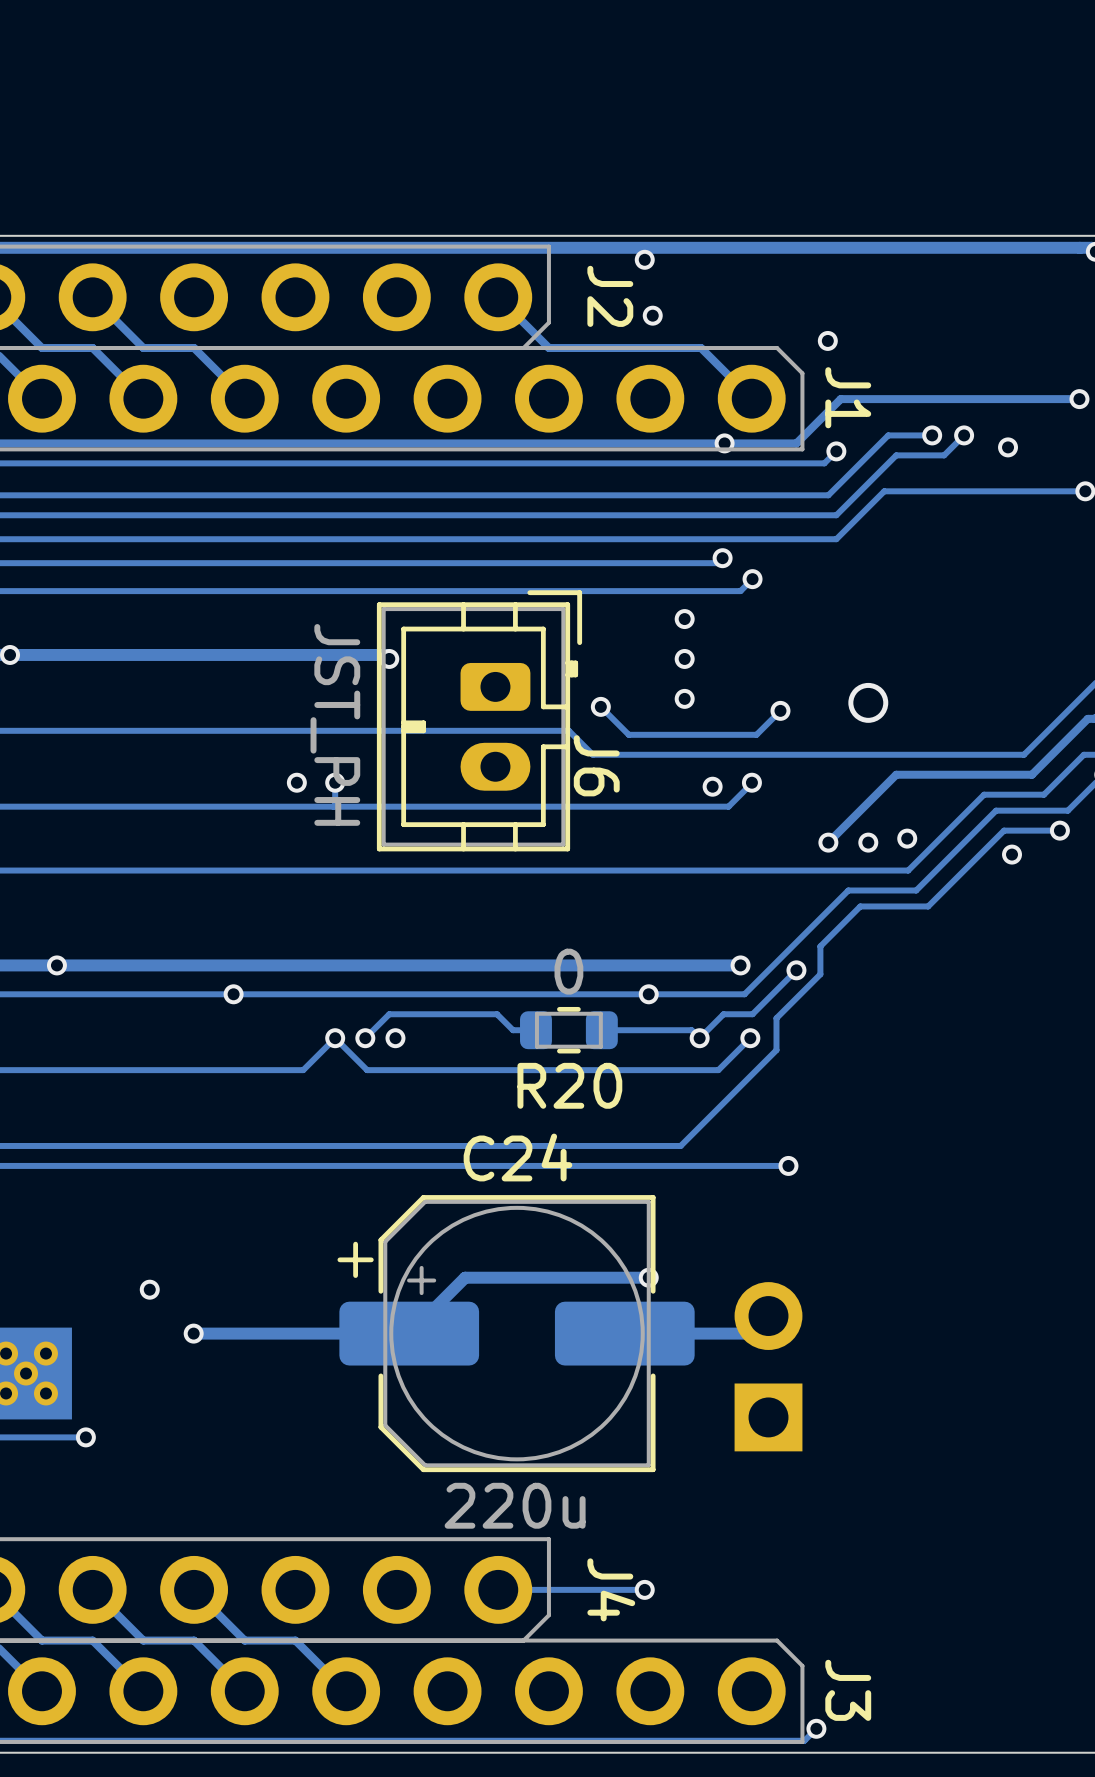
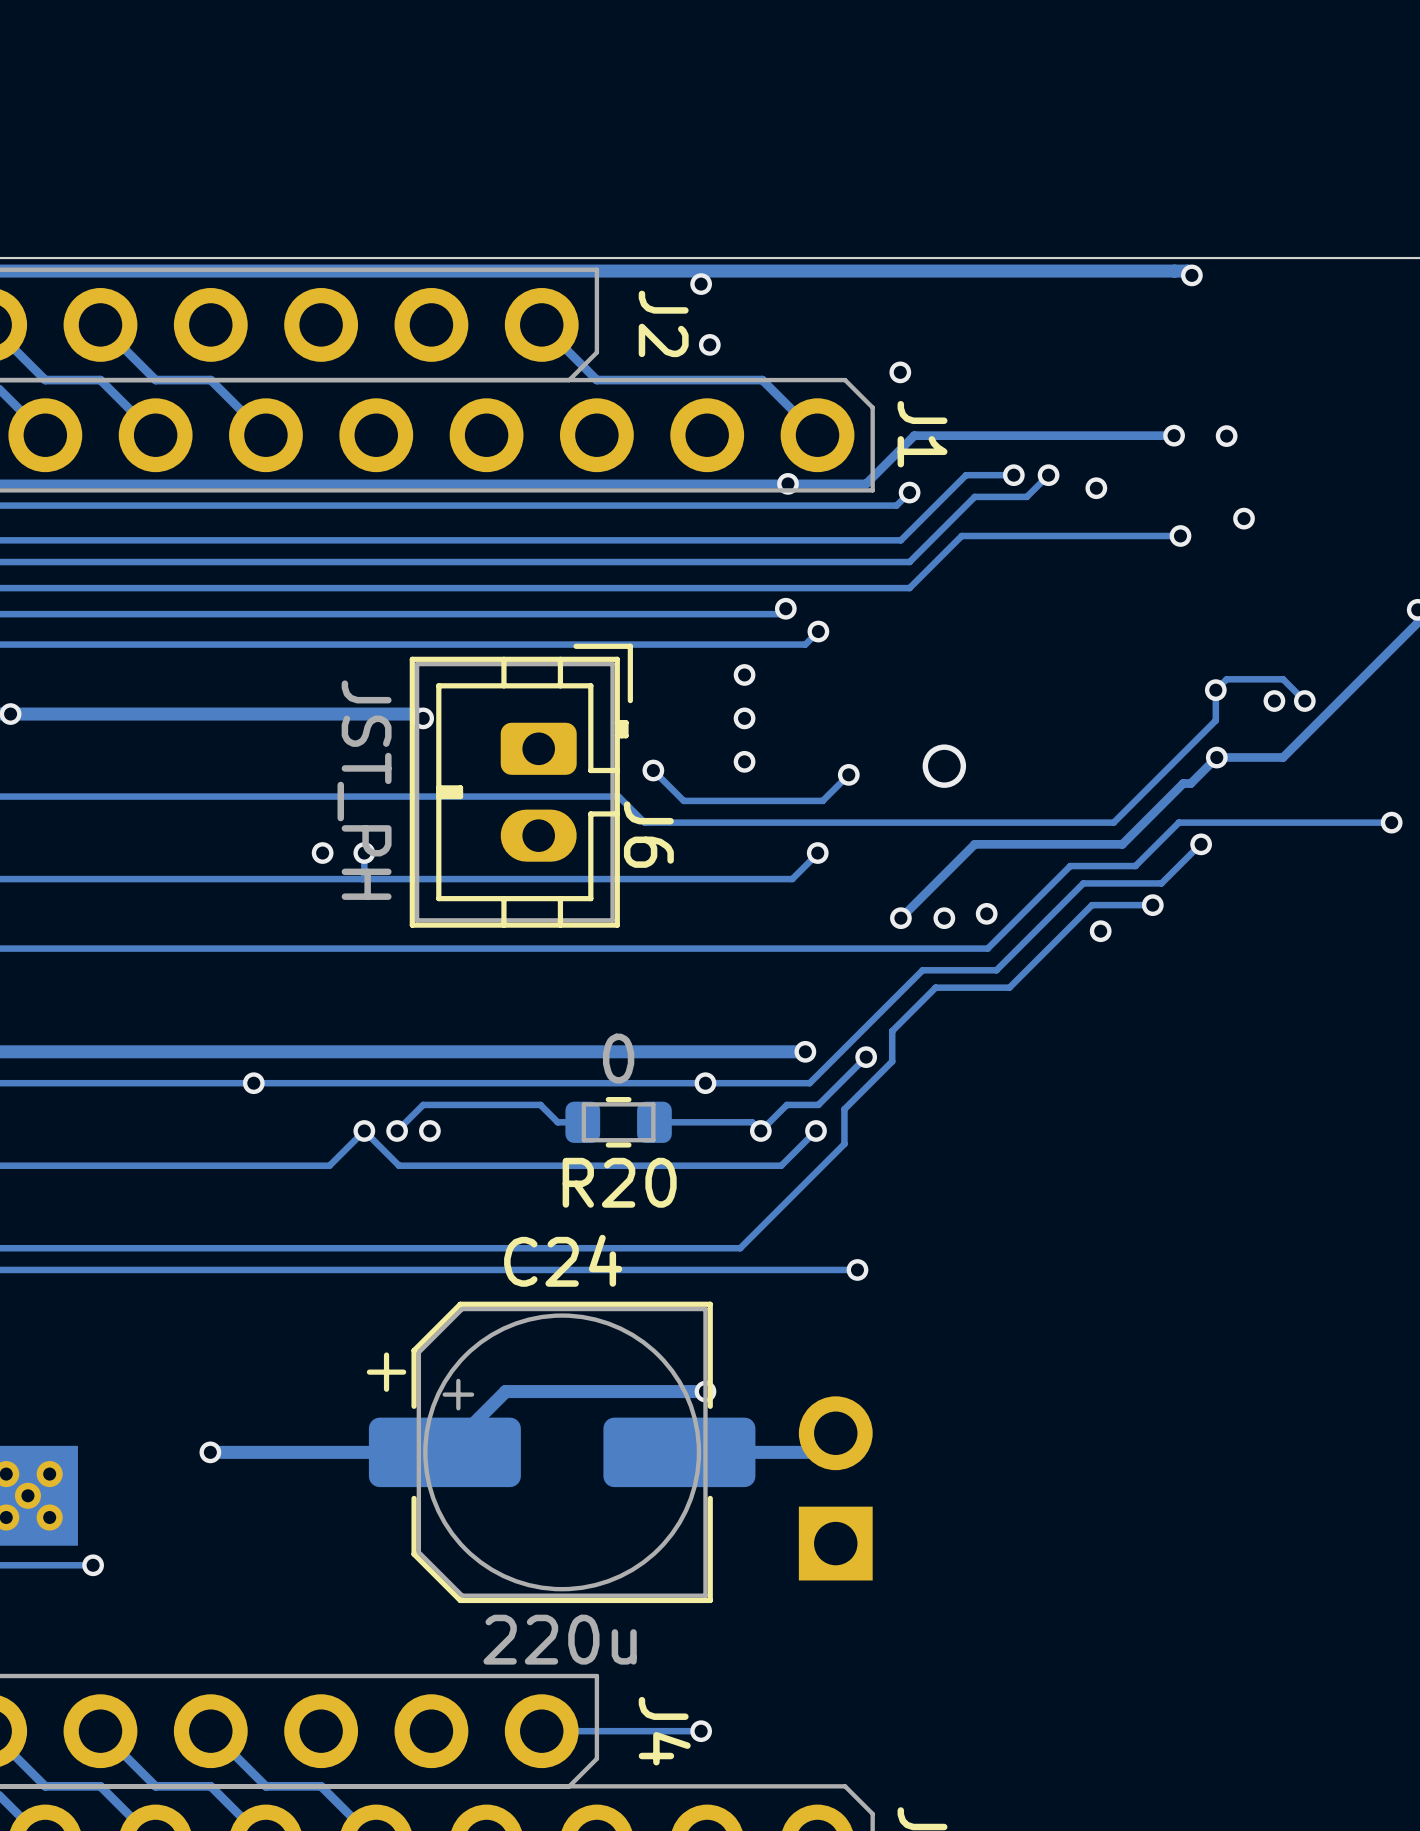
via: (712, 786) -> none
via: (56, 965) -> none
via: (149, 1289) -> none

